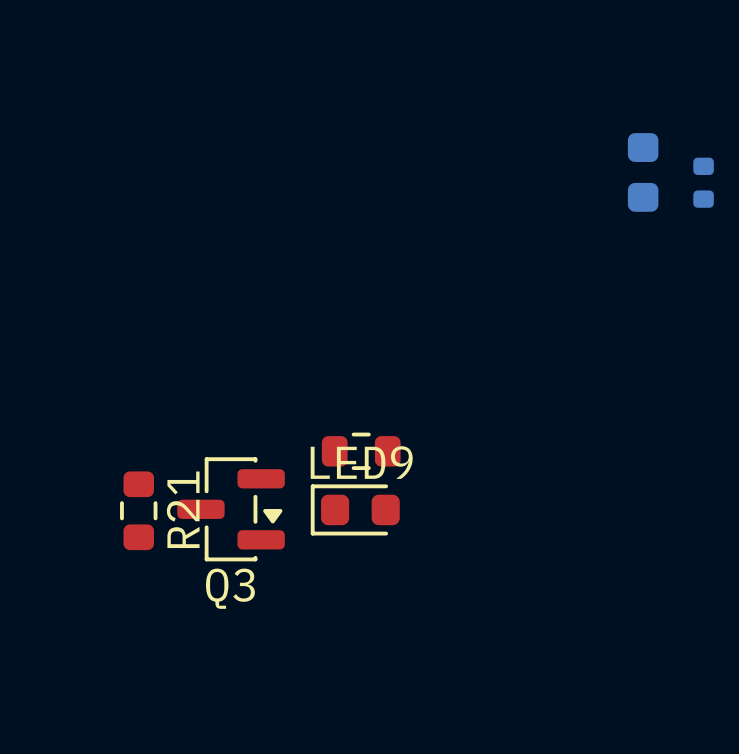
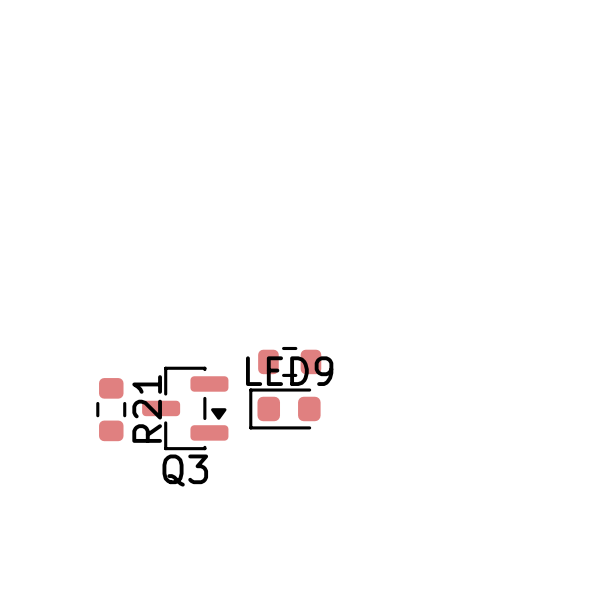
part: (643, 172) -> none
part: (703, 182) -> none

